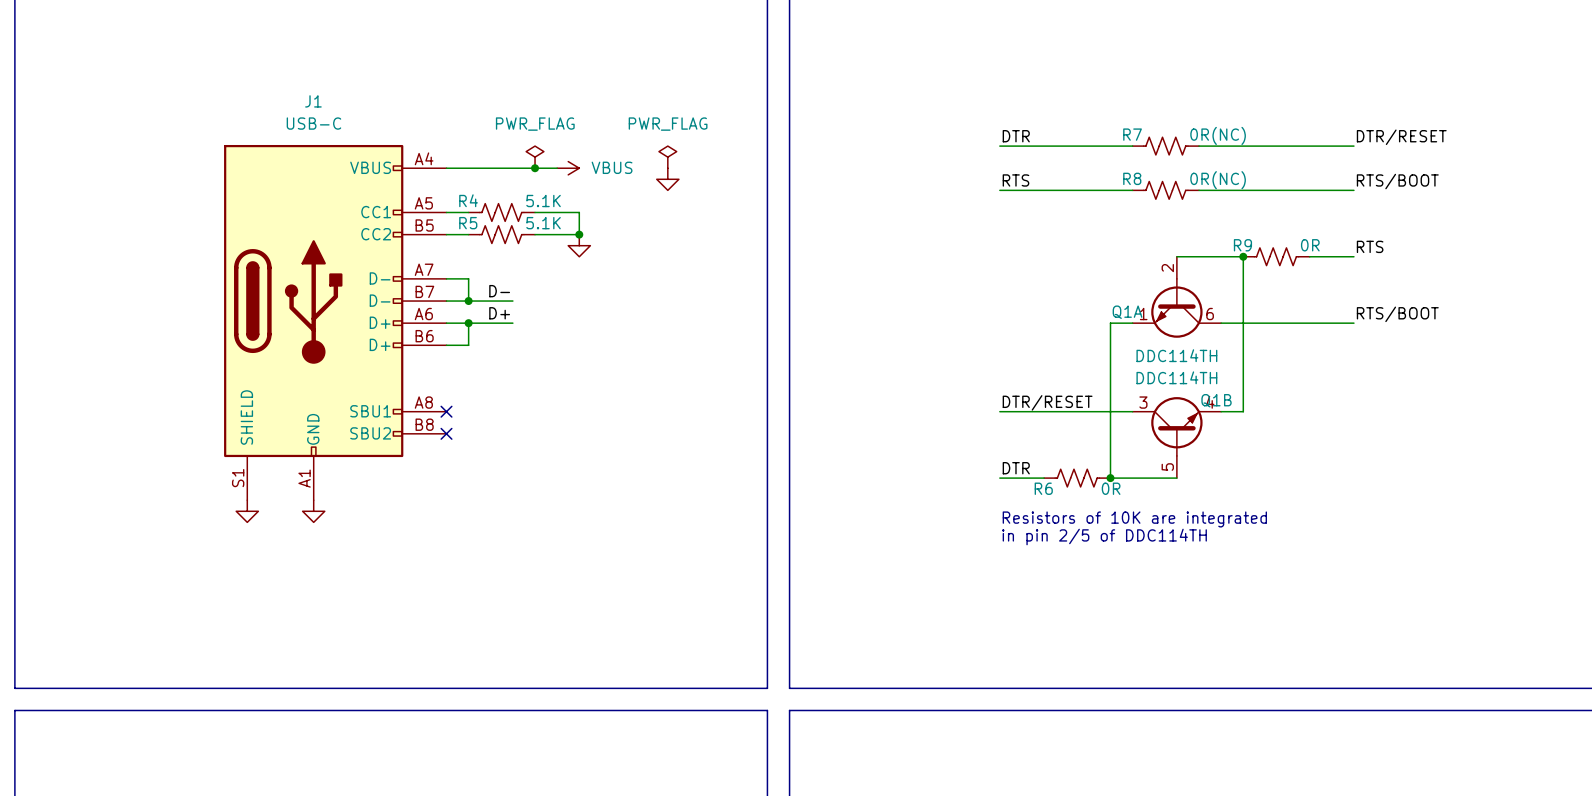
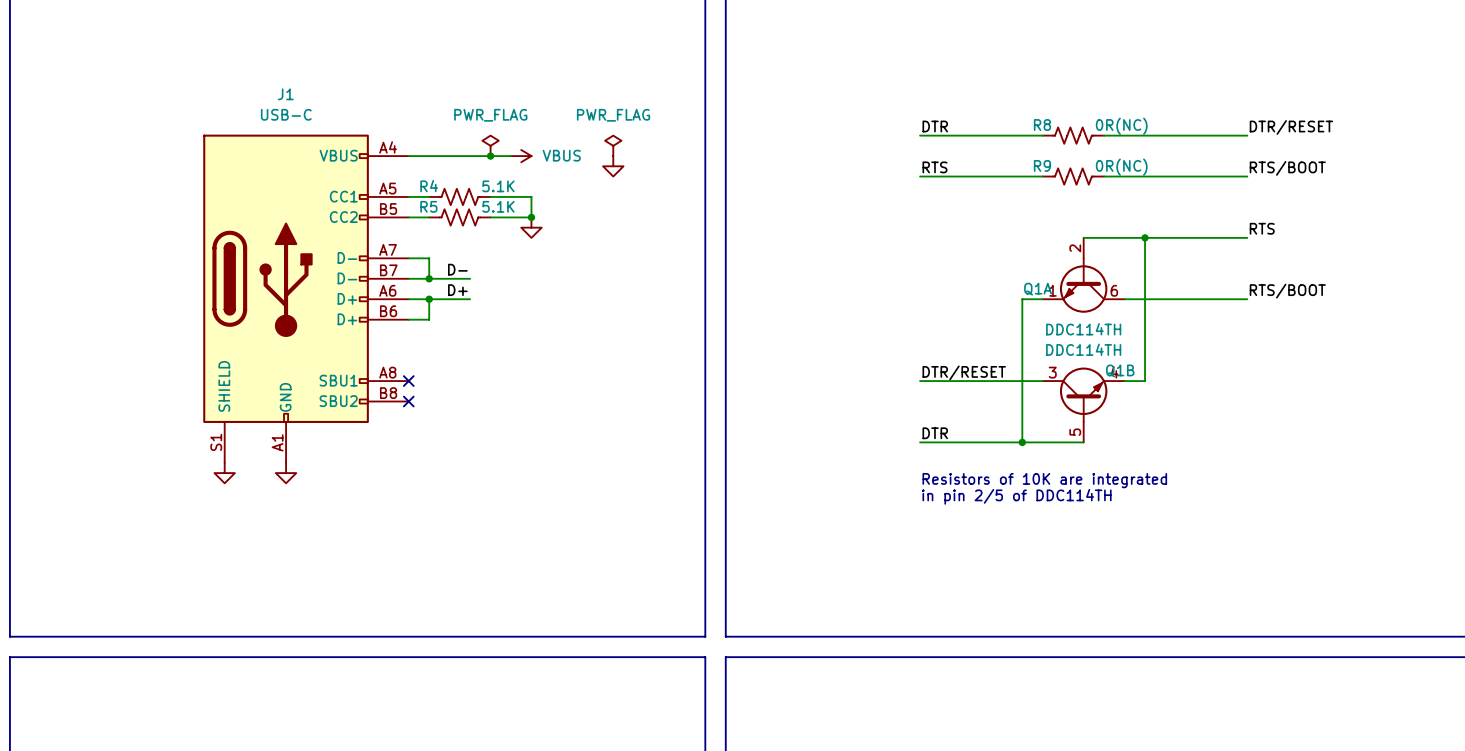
R7 name: R7 (1132, 134) -> R8 (1042, 125)
R8 name: R8 (1132, 178) -> R9 (1042, 165)
R9: 0R (1276, 256) -> none
R6: 0R (1077, 478) -> none

